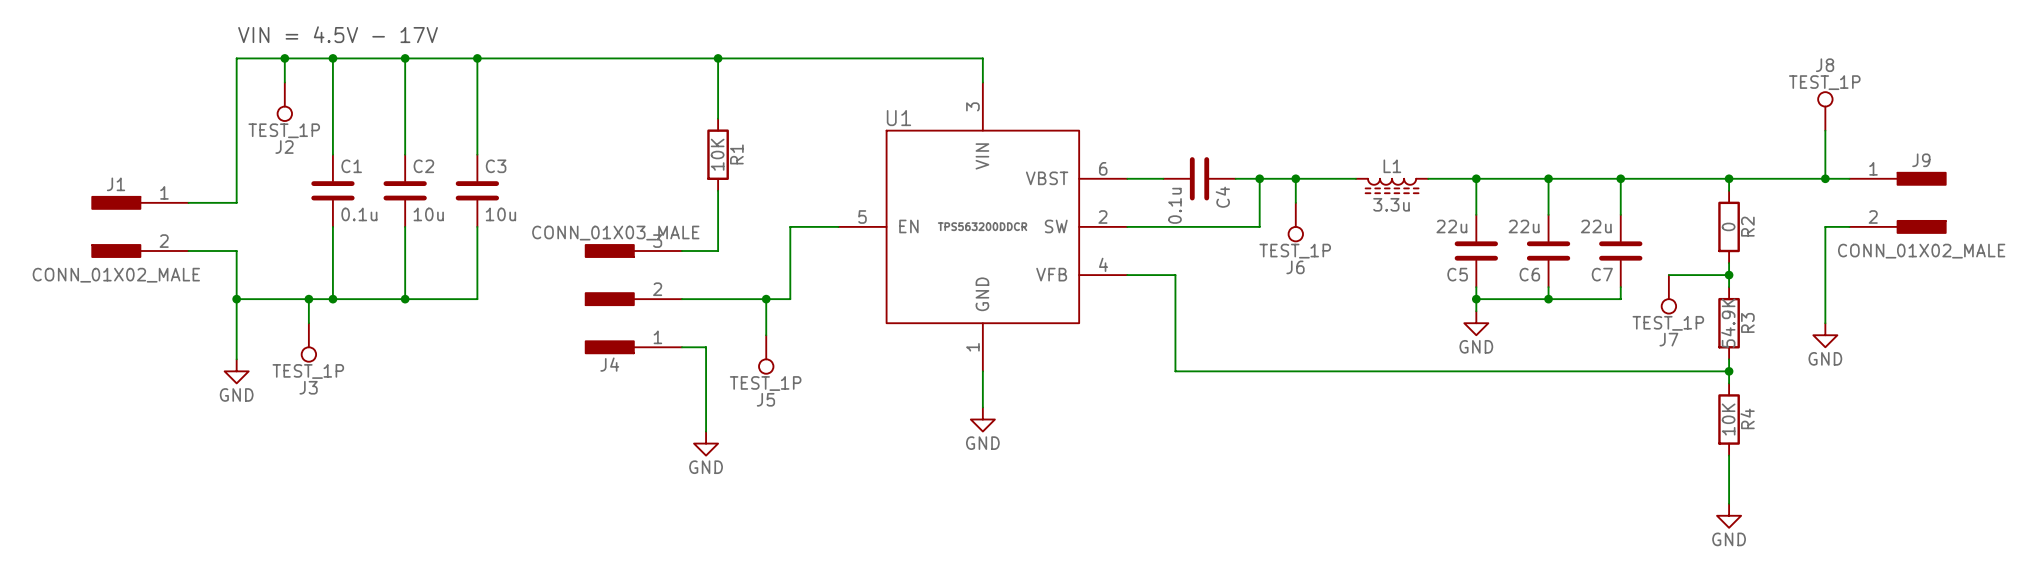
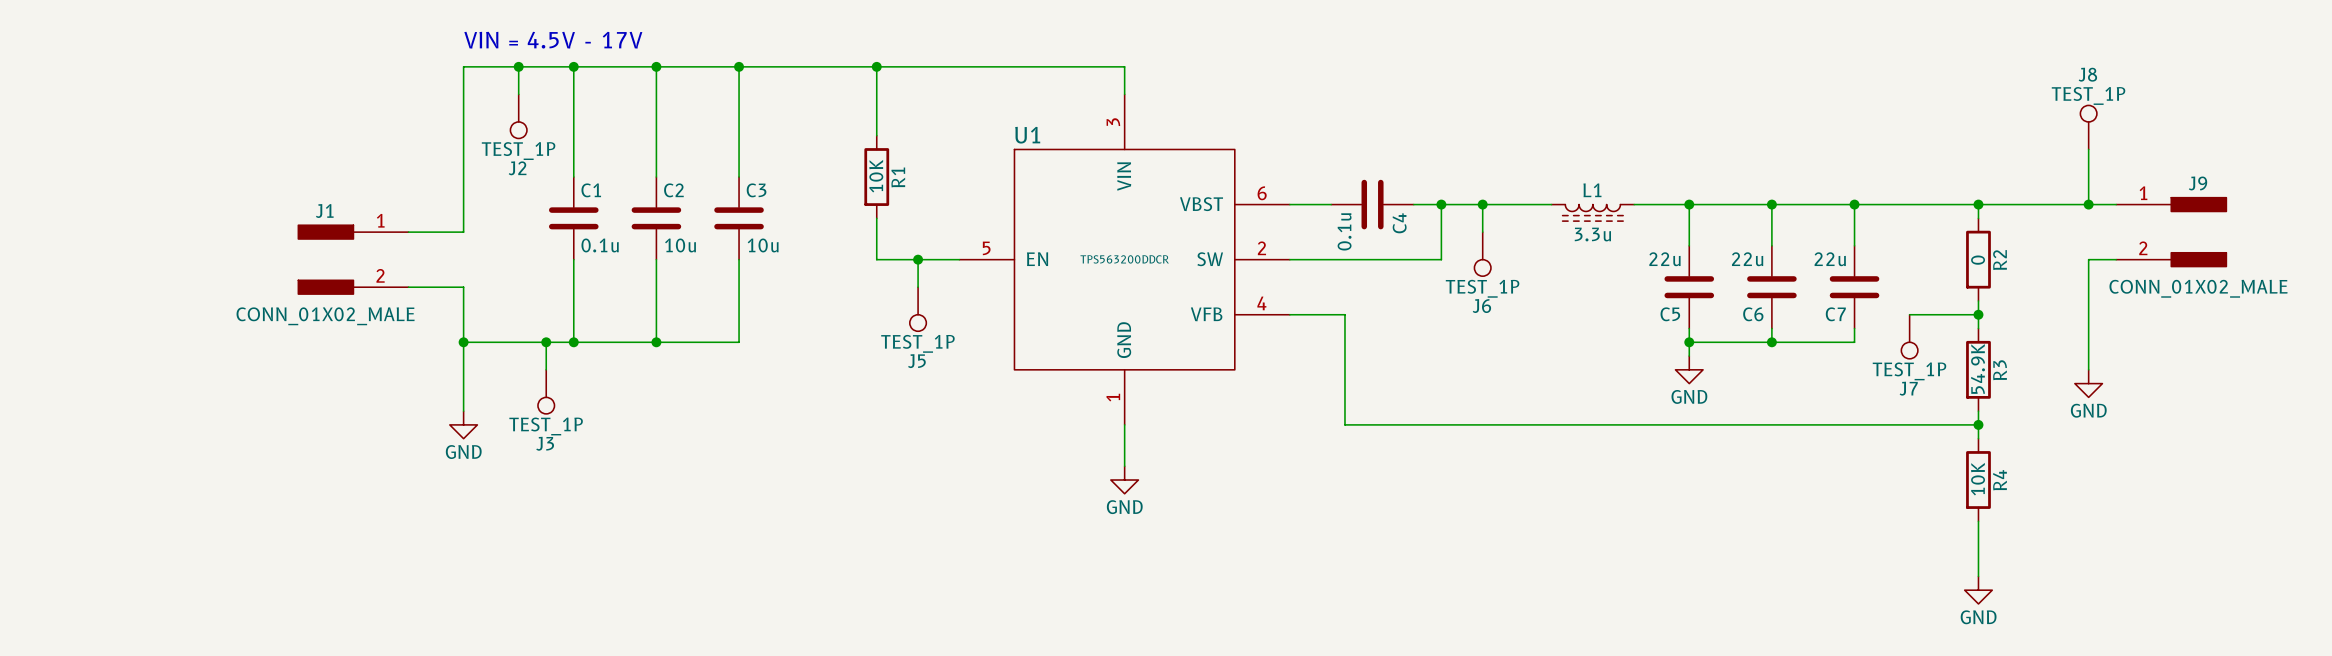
text position: VIN = 4.5V - 17V (338, 34) -> VIN = 4.5V - 17V (553, 40)
wire: (284, 58) (284, 82) -> (518, 66) (518, 94)
junction: (284, 58) -> none
wire: (332, 58) (332, 154) -> (573, 66) (573, 177)
junction: (332, 58) -> none
wire: (405, 58) (236, 58) (236, 202) (188, 202) -> none
junction: (405, 58) -> none
junction: none -> (518, 66)
wire: (477, 58) (477, 154) -> (739, 66) (739, 177)
junction: (477, 58) -> none
junction: none -> (573, 66)
wire: none -> (656, 66) (656, 177)
junction: none -> (656, 66)
junction: none -> (739, 66)
wire: (718, 58) (718, 118) -> (876, 66) (876, 135)
junction: (718, 58) -> none
junction: none -> (876, 66)
J2 position: (284, 101) -> (518, 116)
wire: none -> (463, 177) (463, 232) (408, 232)
R1 position: (718, 154) -> (876, 177)
C1 position: (332, 190) -> (573, 218)
C2 position: (405, 190) -> (656, 218)
C3 position: (477, 190) -> (739, 218)
wire: (718, 190) (718, 251) (681, 251) -> none
J1 position: (140, 226) -> (353, 259)
wire: (332, 226) (332, 299) -> (573, 259) (573, 342)
wire: (405, 226) (405, 251) -> (408, 287) (463, 287)
wire: (477, 226) (477, 299) -> (656, 259) (656, 342)
wire: none -> (739, 259) (739, 342) (546, 342) (546, 369)
wire: (790, 226) (790, 299) (681, 299) -> (904, 259) (876, 259) (876, 218)
wire: none -> (918, 259) (918, 287)
junction: none -> (918, 259)
wire: (188, 251) (236, 251) (236, 359) -> none
wire: (236, 299) (405, 299) -> (463, 411) (463, 342)
junction: (236, 299) -> none
wire: (308, 299) (308, 323) -> none
junction: (308, 299) -> none
junction: (332, 299) -> none
junction: none -> (546, 342)
junction: none -> (573, 342)
junction: none -> (656, 342)
J4: CONN_01X03_MALE (633, 299) -> none
wire: (766, 299) (766, 335) -> none
junction: (766, 299) -> none
J3 position: (308, 342) -> (546, 391)
wire: (681, 347) (706, 347) (706, 431) -> none
J5 position: (766, 354) -> (918, 309)
power symbol: GND (236, 371) -> none
power symbol: none -> GND (463, 424)
power symbol: GND (706, 443) -> none

